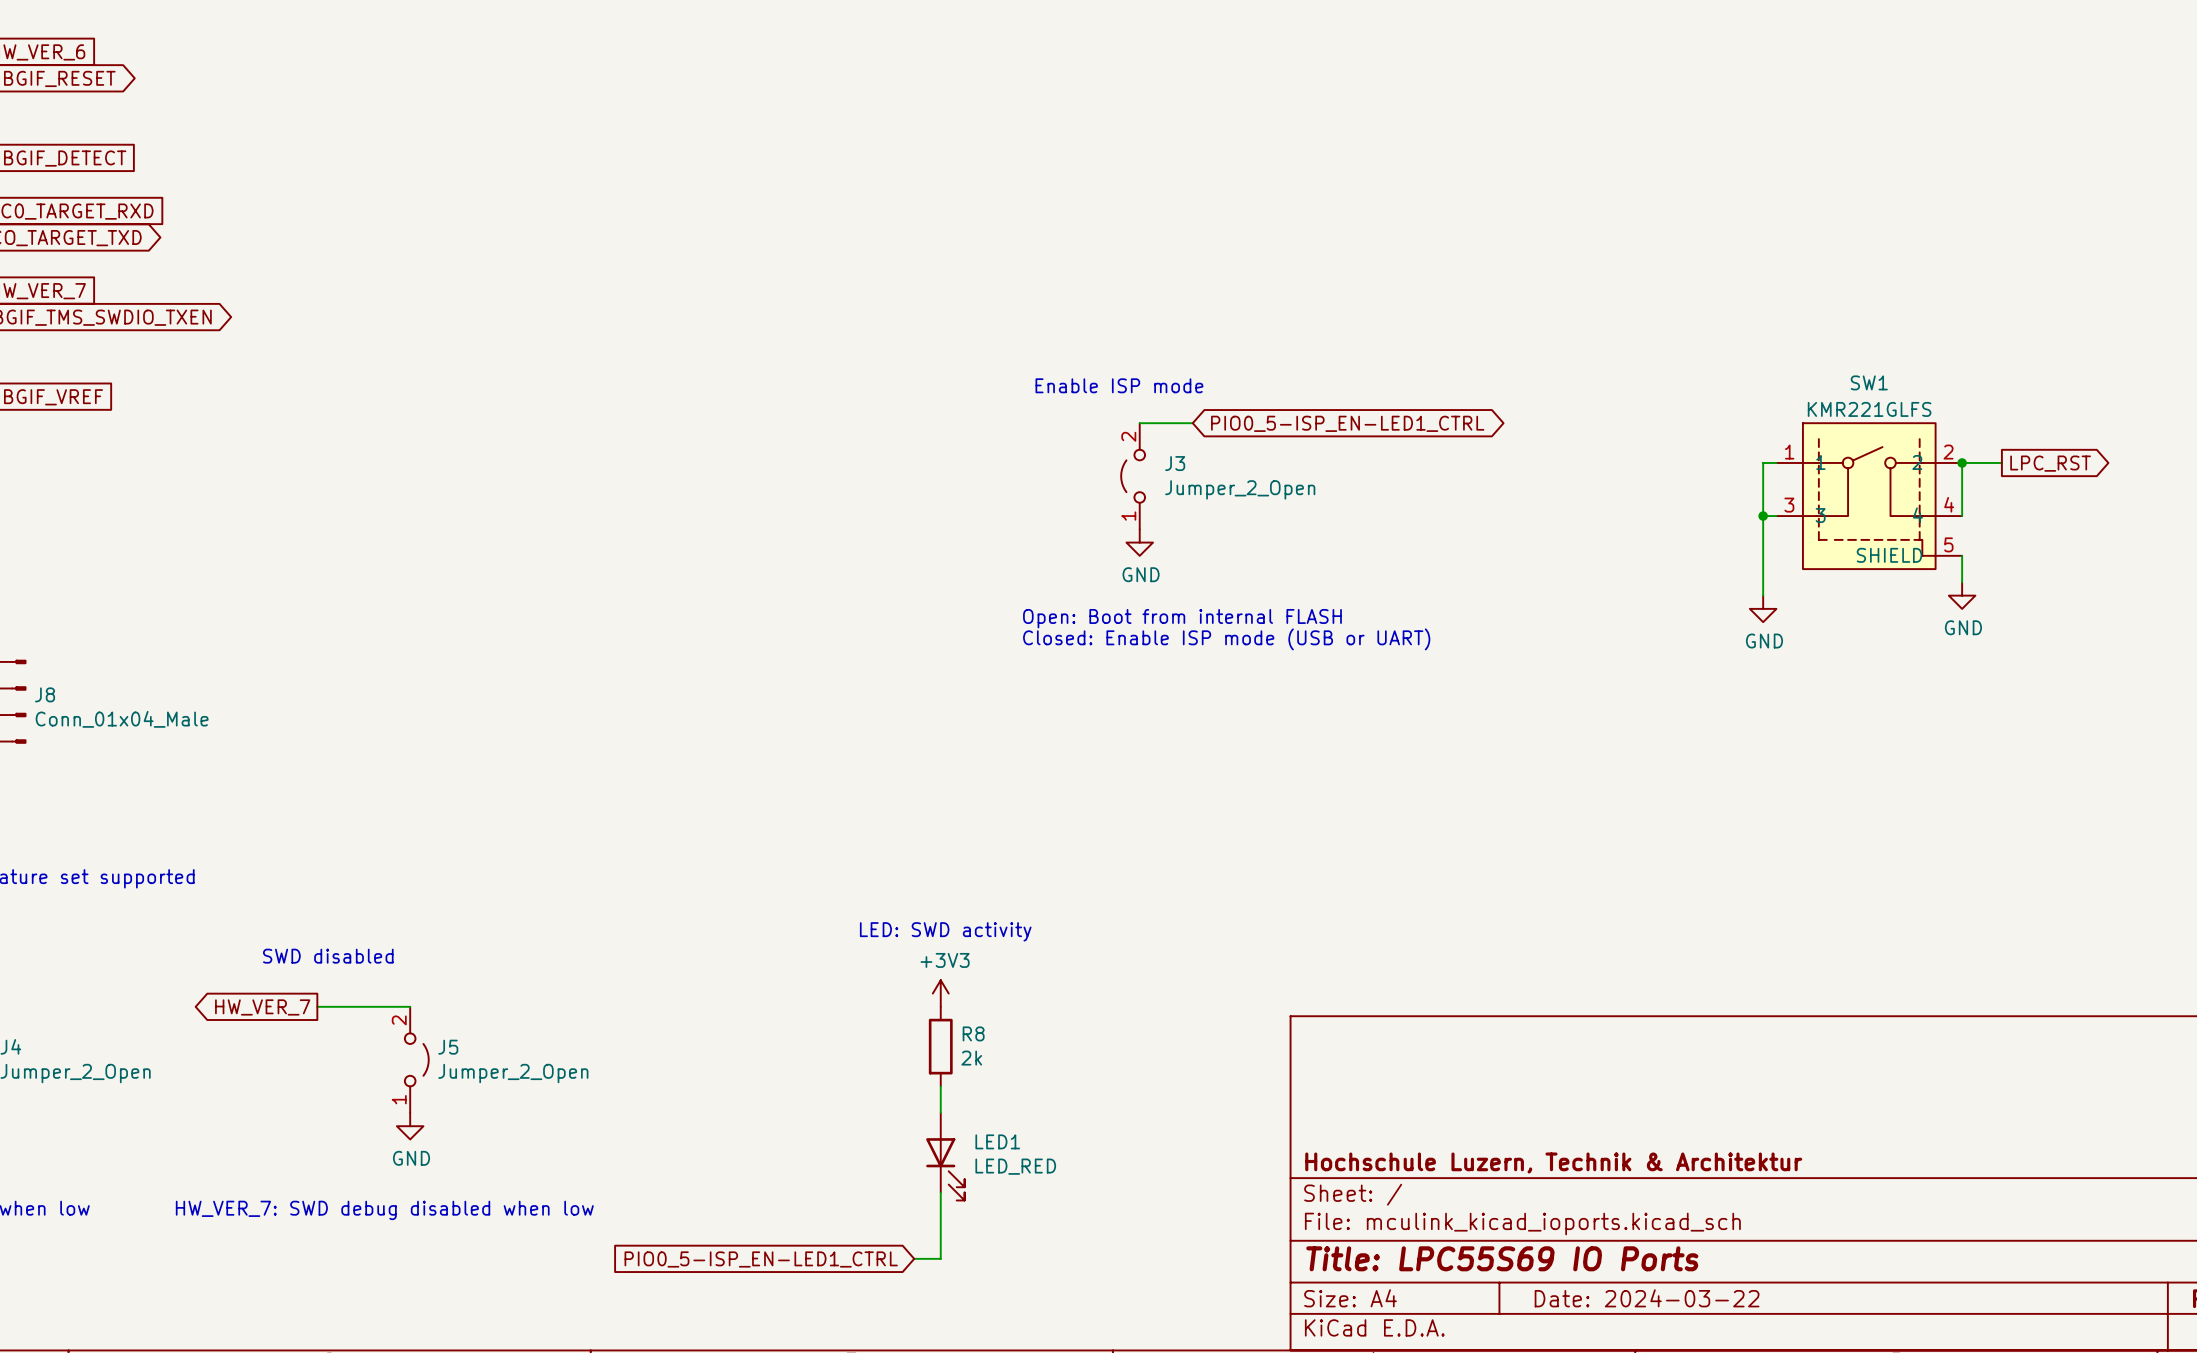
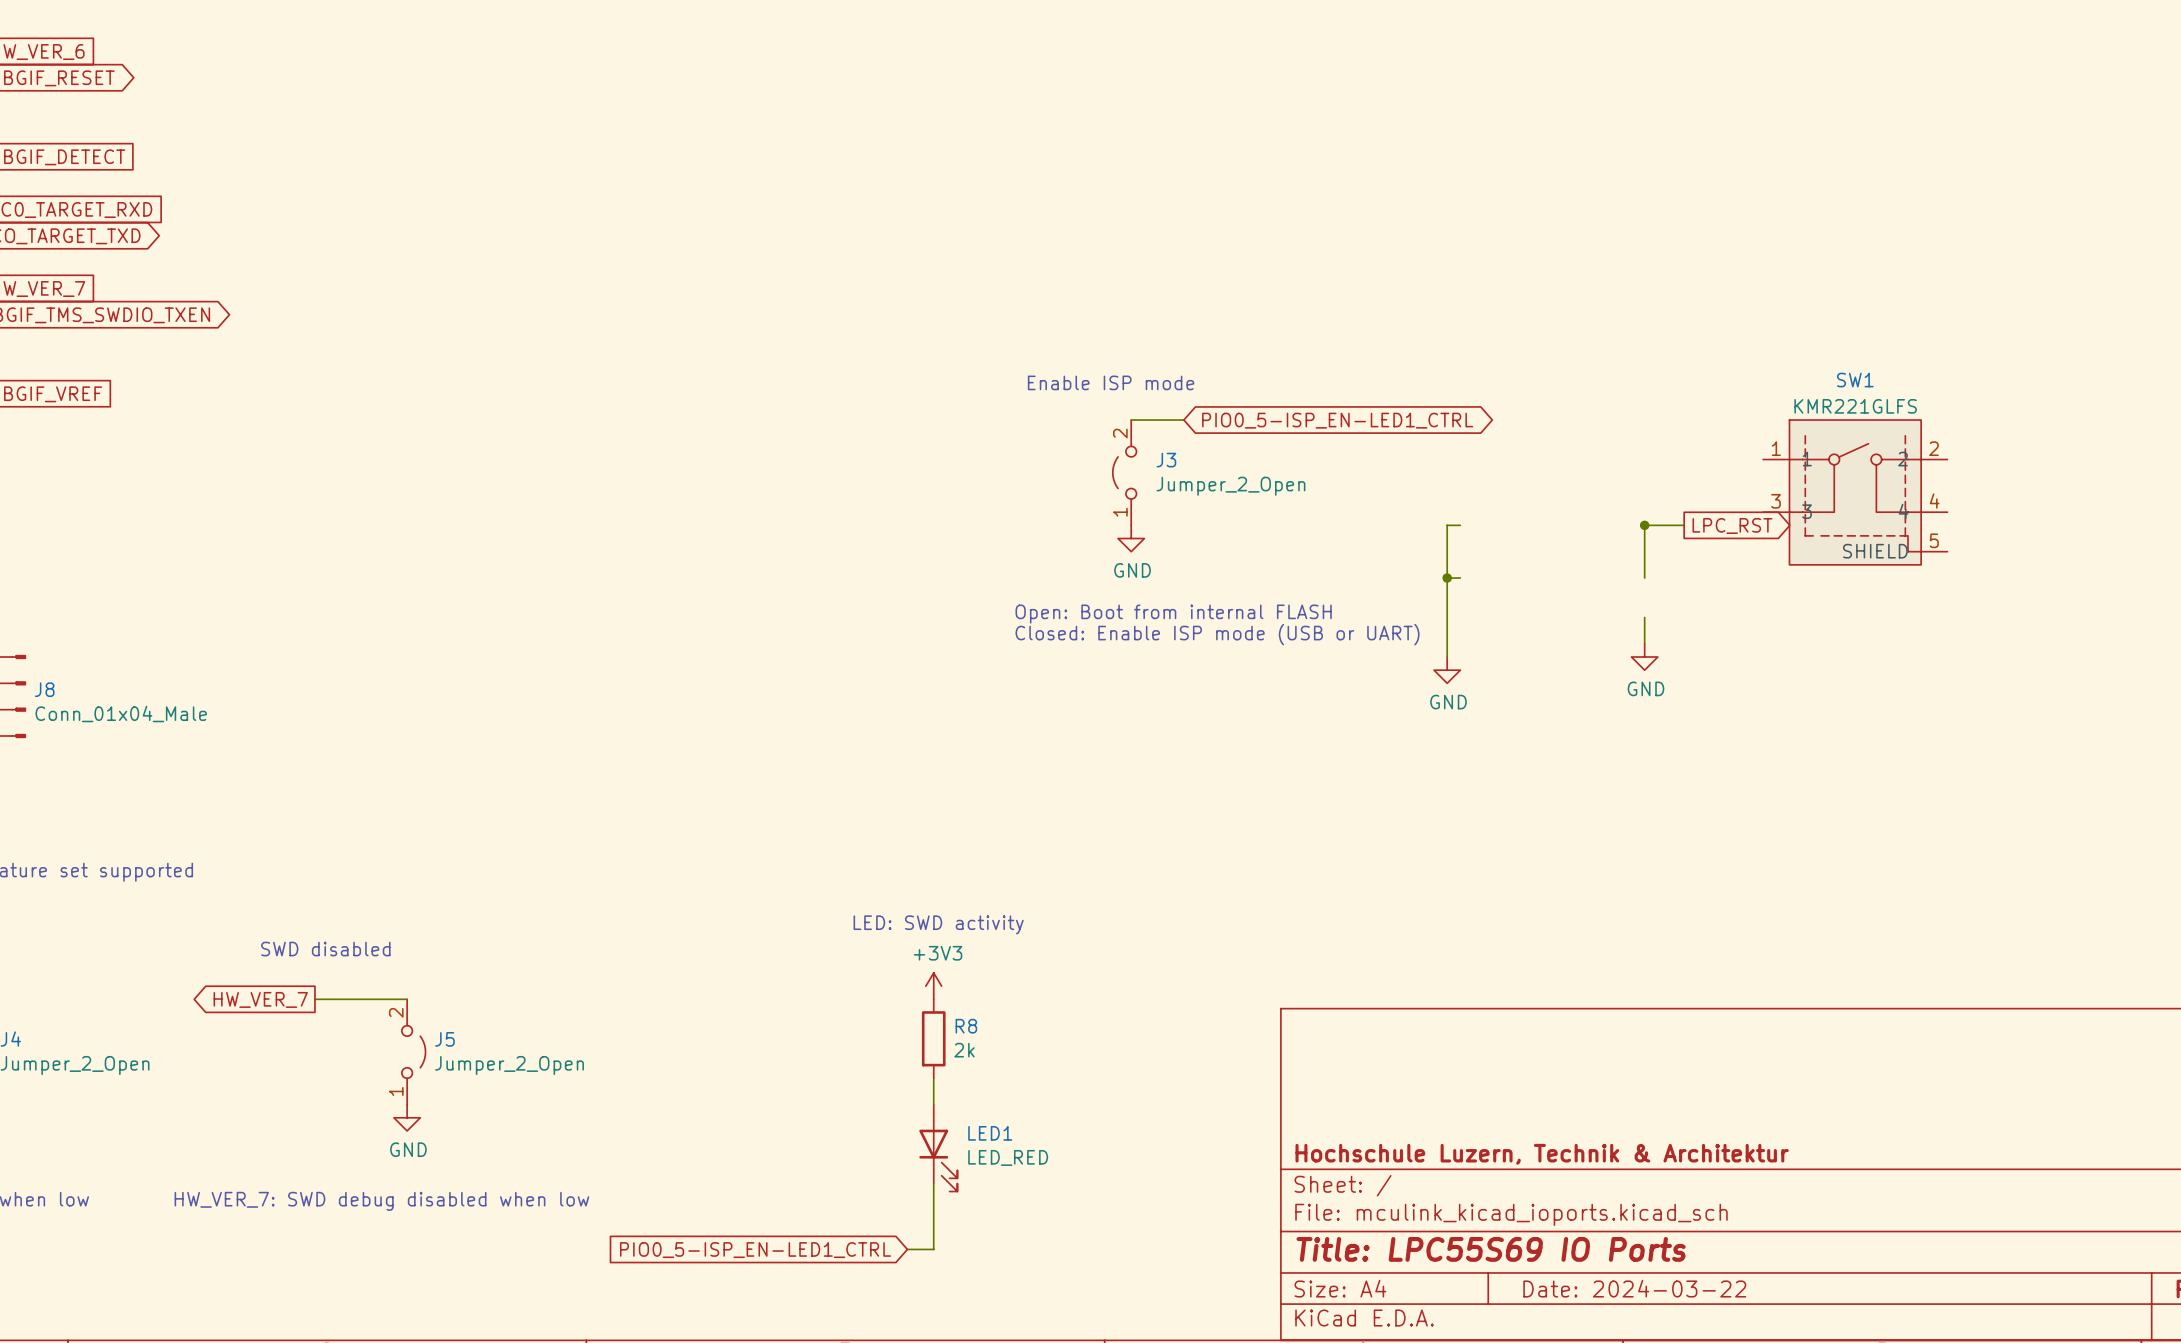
wire: (1776, 462) (1763, 462) (1763, 595) -> none
junction: (1962, 462) -> none
wire: (2001, 462) (1962, 462) (1962, 516) -> none
global label: LPC_RST (2050, 463) -> none
junction: (1763, 516) -> none
wire: none -> (1460, 525) (1447, 525) (1447, 657)
junction: none -> (1644, 525)
wire: none -> (1684, 525) (1644, 525) (1644, 578)
global label: none -> LPC_RST (1732, 525)
wire: (1962, 555) (1962, 582) -> none
wire: none -> (1447, 578) (1460, 578)
junction: none -> (1447, 578)
power symbol: GND (1962, 595) -> none
power symbol position: GND (1763, 608) -> GND (1644, 657)
wire: none -> (1644, 617) (1644, 643)
power symbol: none -> GND (1447, 670)

